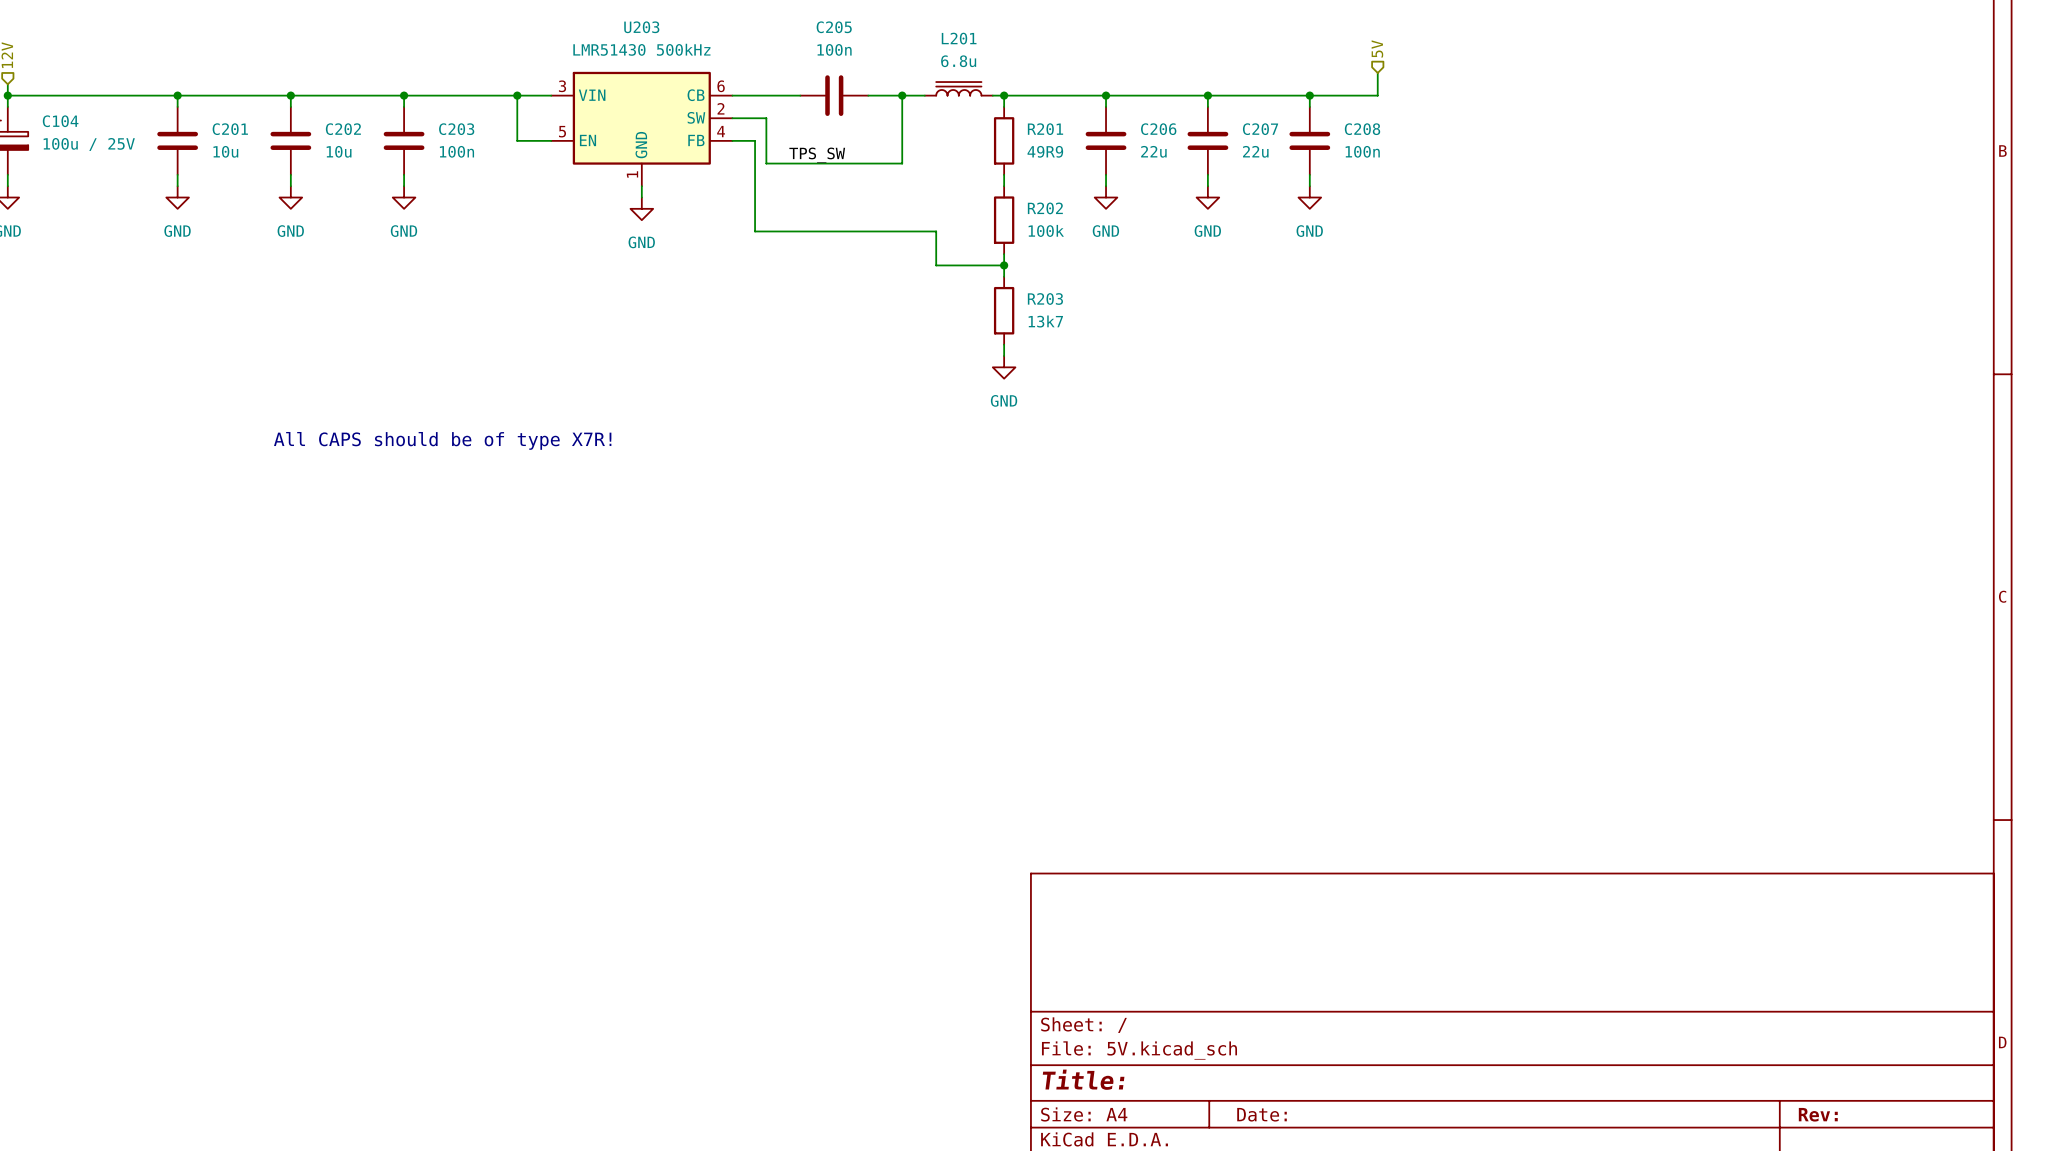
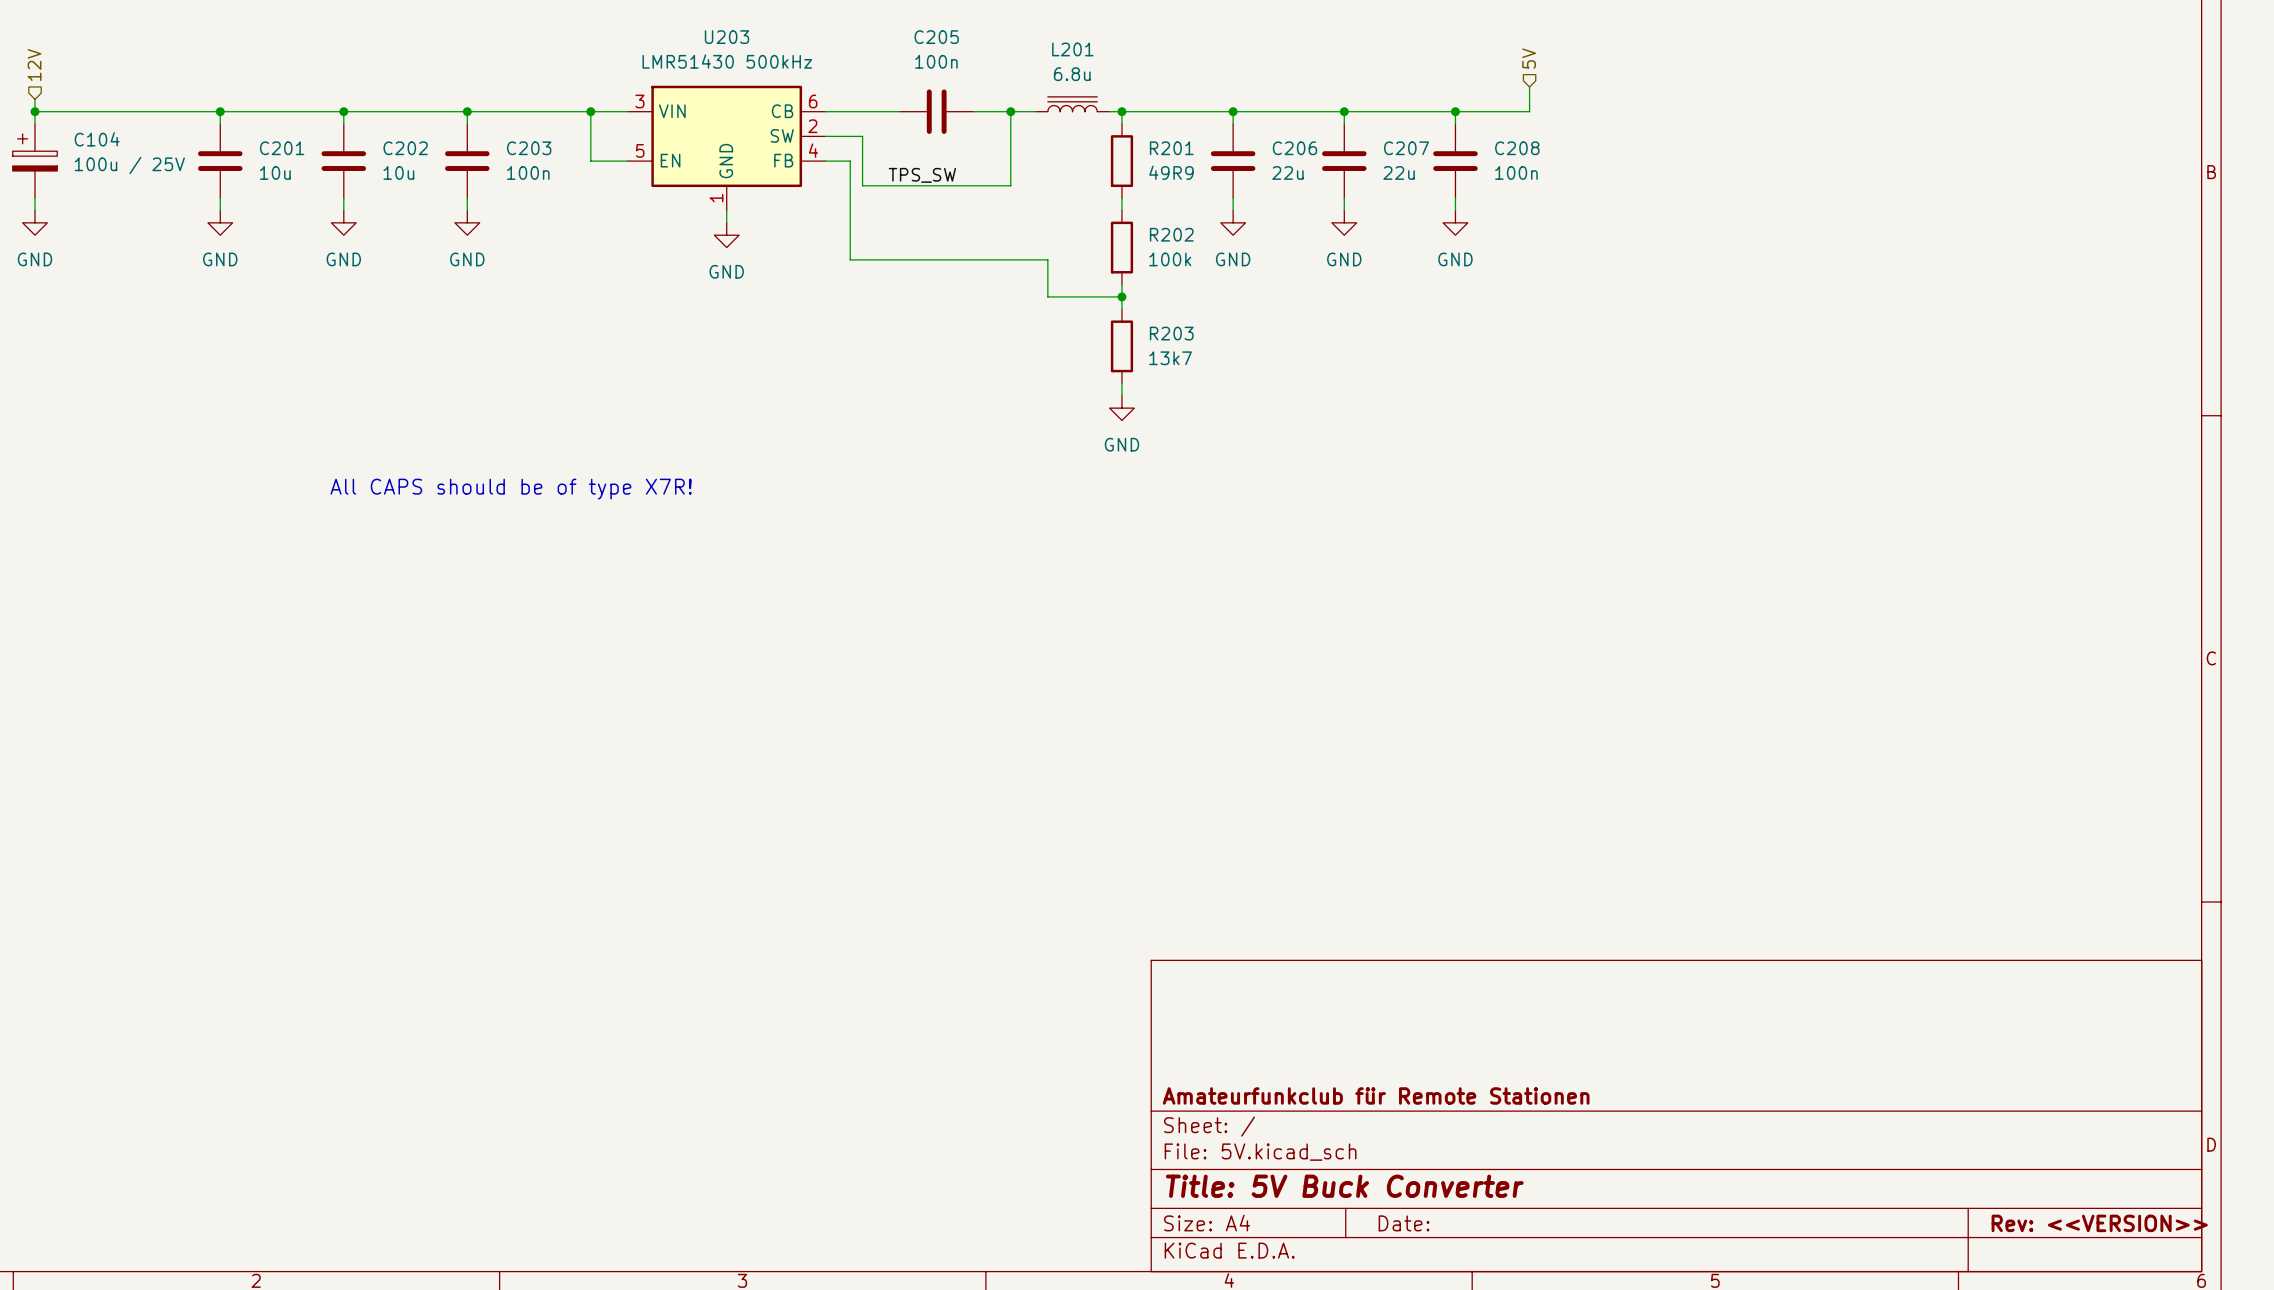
title block: none -> Amateurfunkclub für Remote Stationen (1376, 1095)
title block: Title: (1083, 1079) -> Title: 5V Buck Converter (1344, 1186)
title block: Rev: (1818, 1114) -> Rev: <<VERSION>> (2099, 1223)

